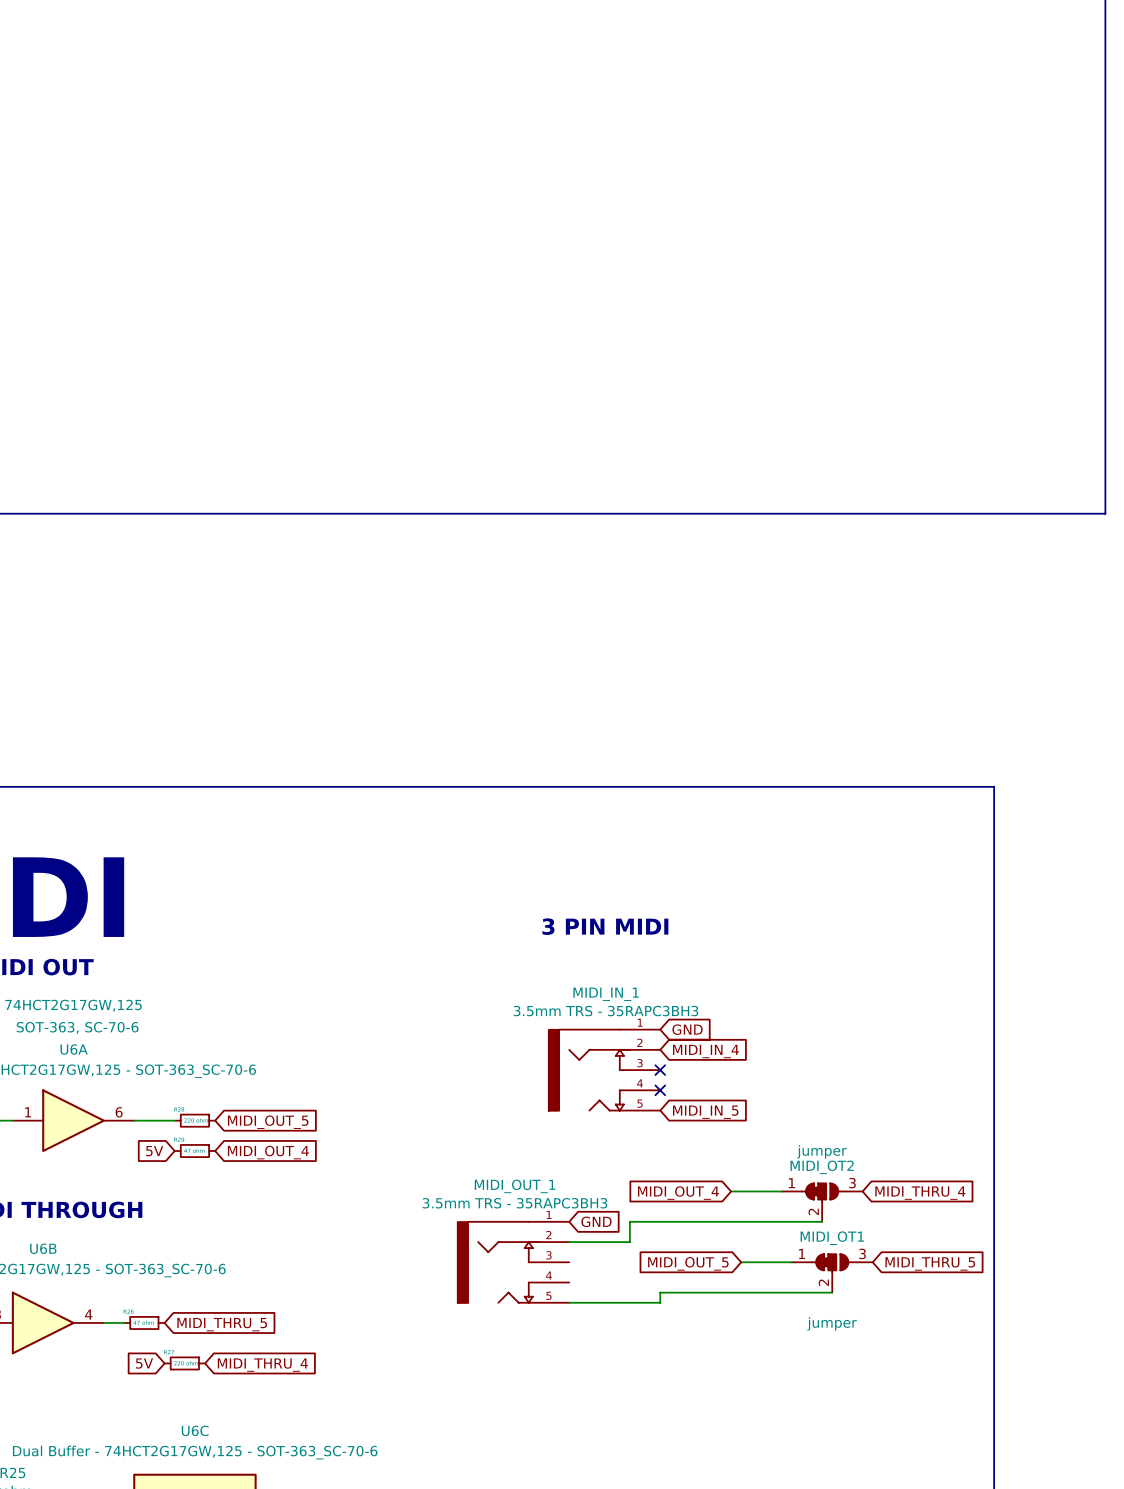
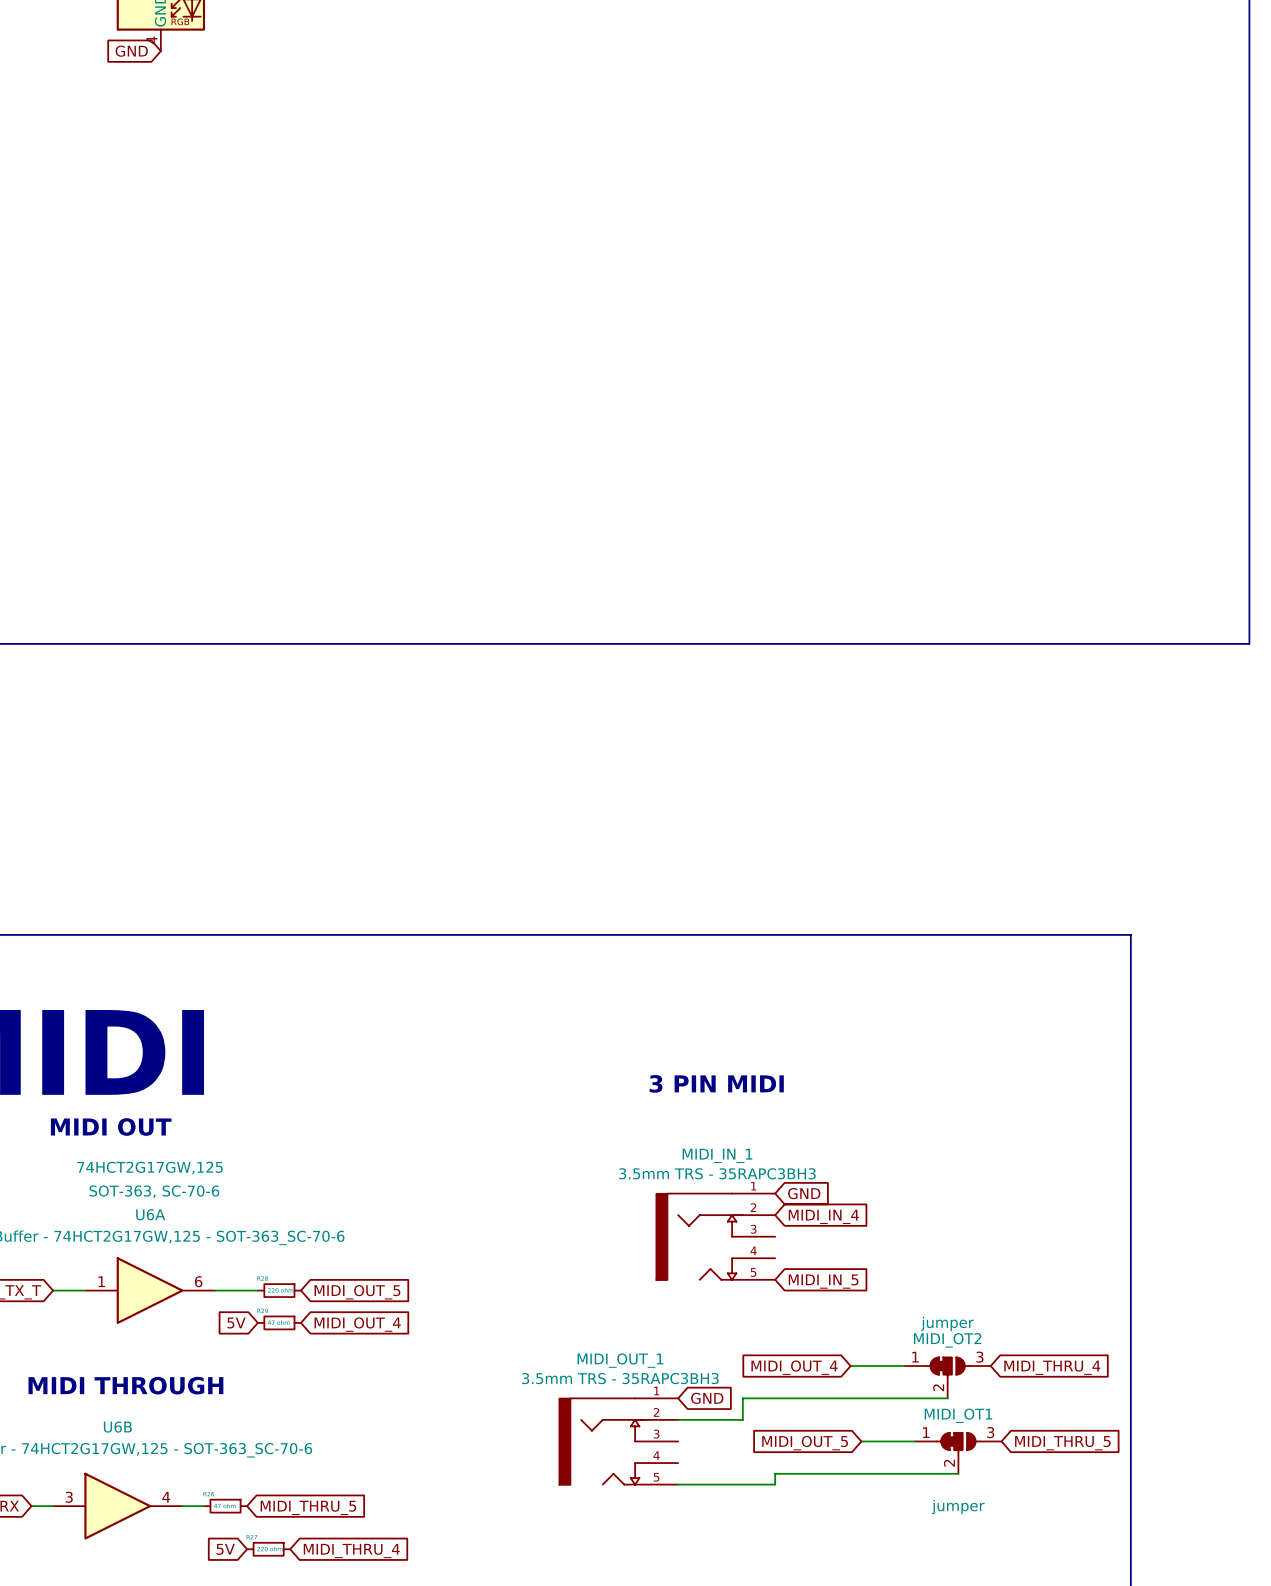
no-connect mark: (660, 1070) -> none
no-connect mark: (660, 1090) -> none

